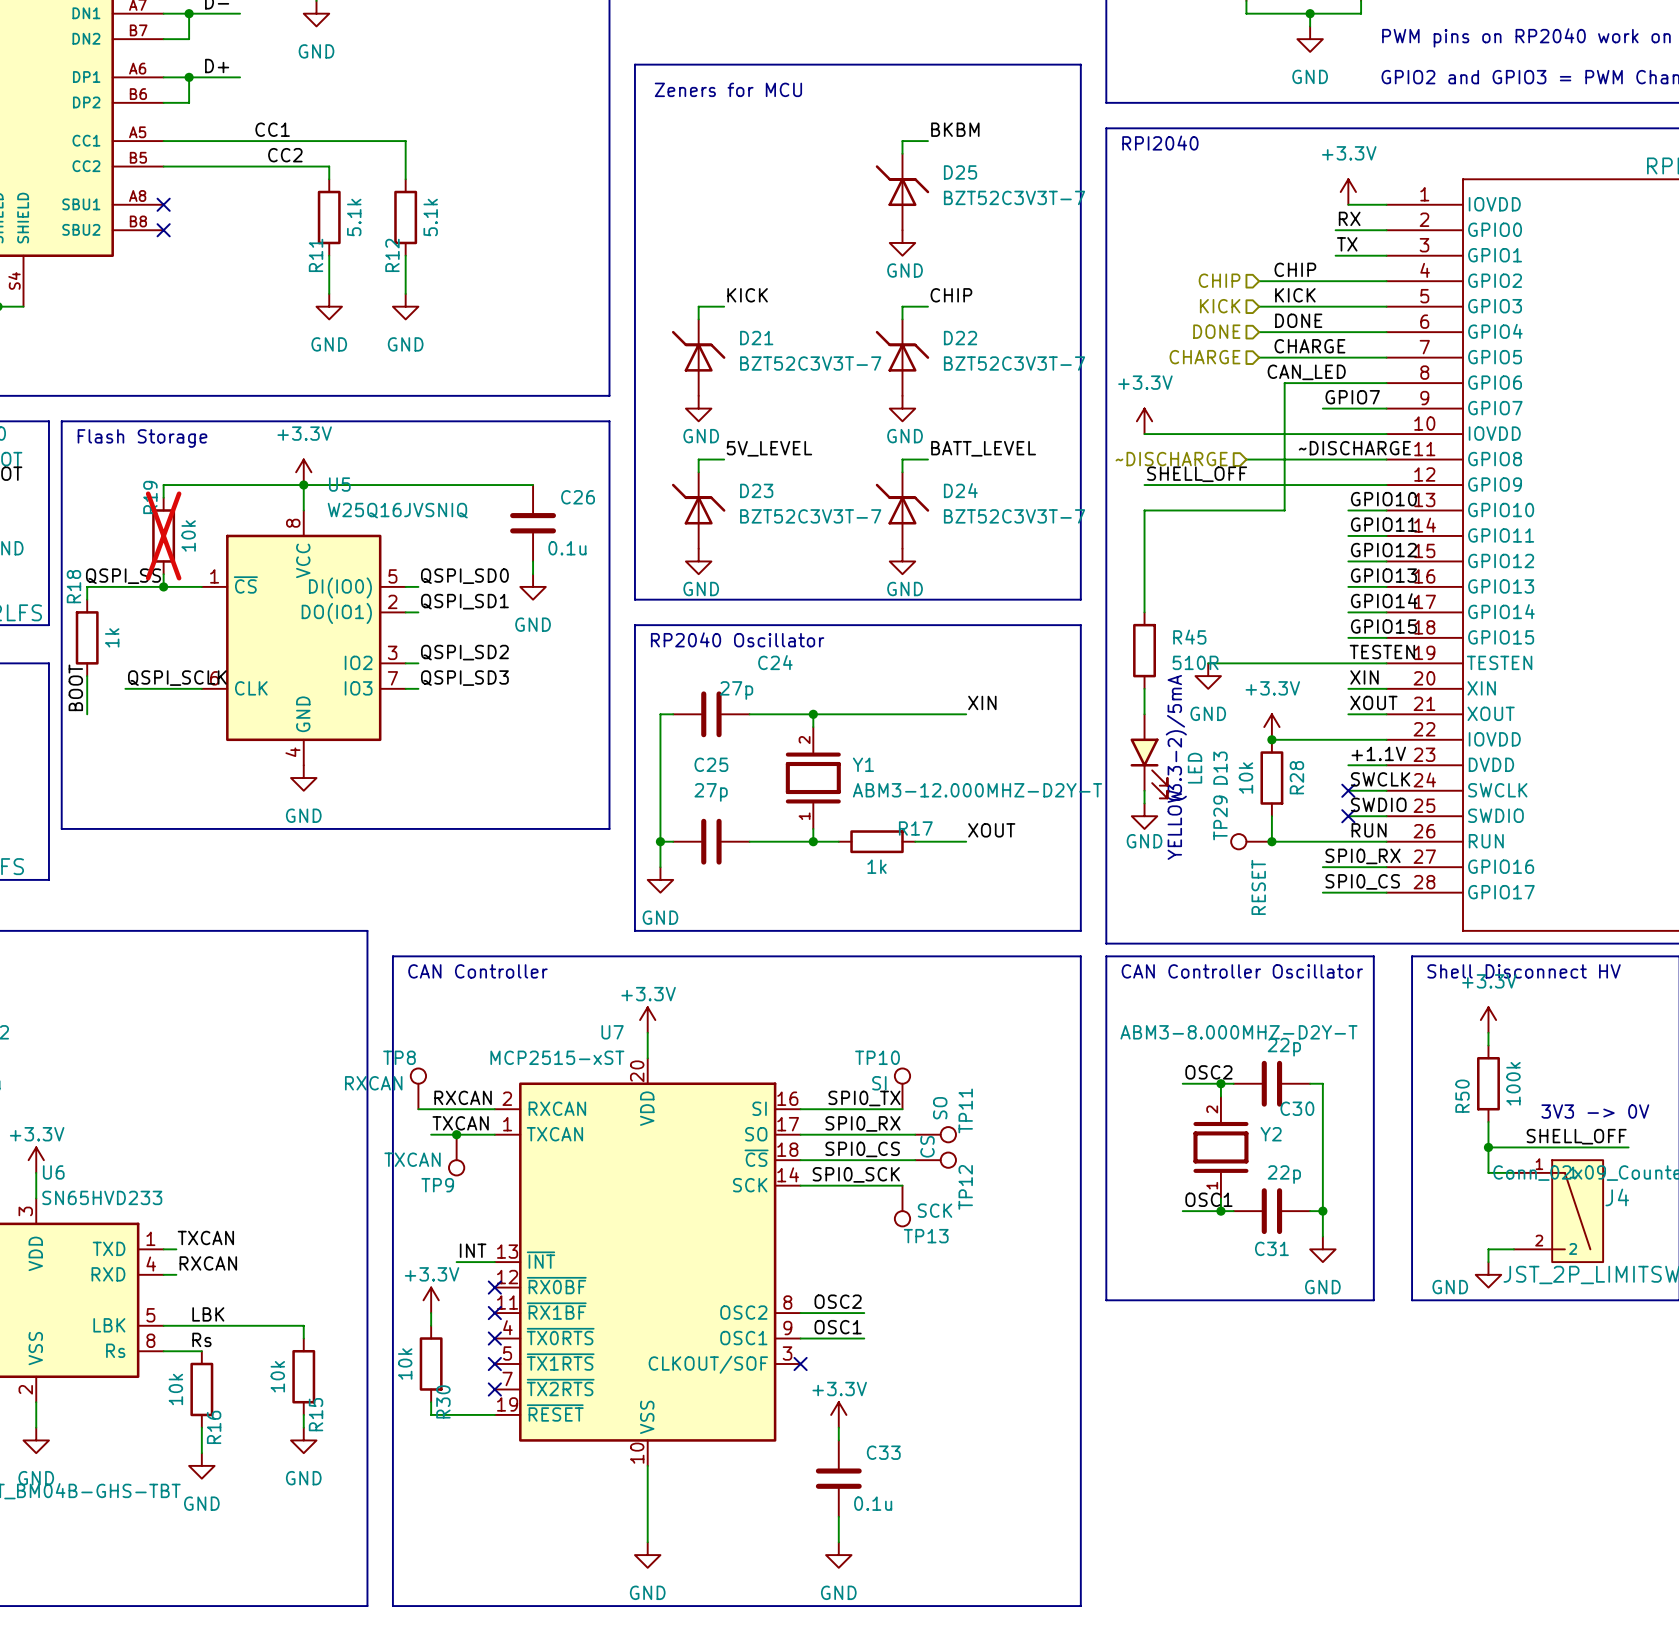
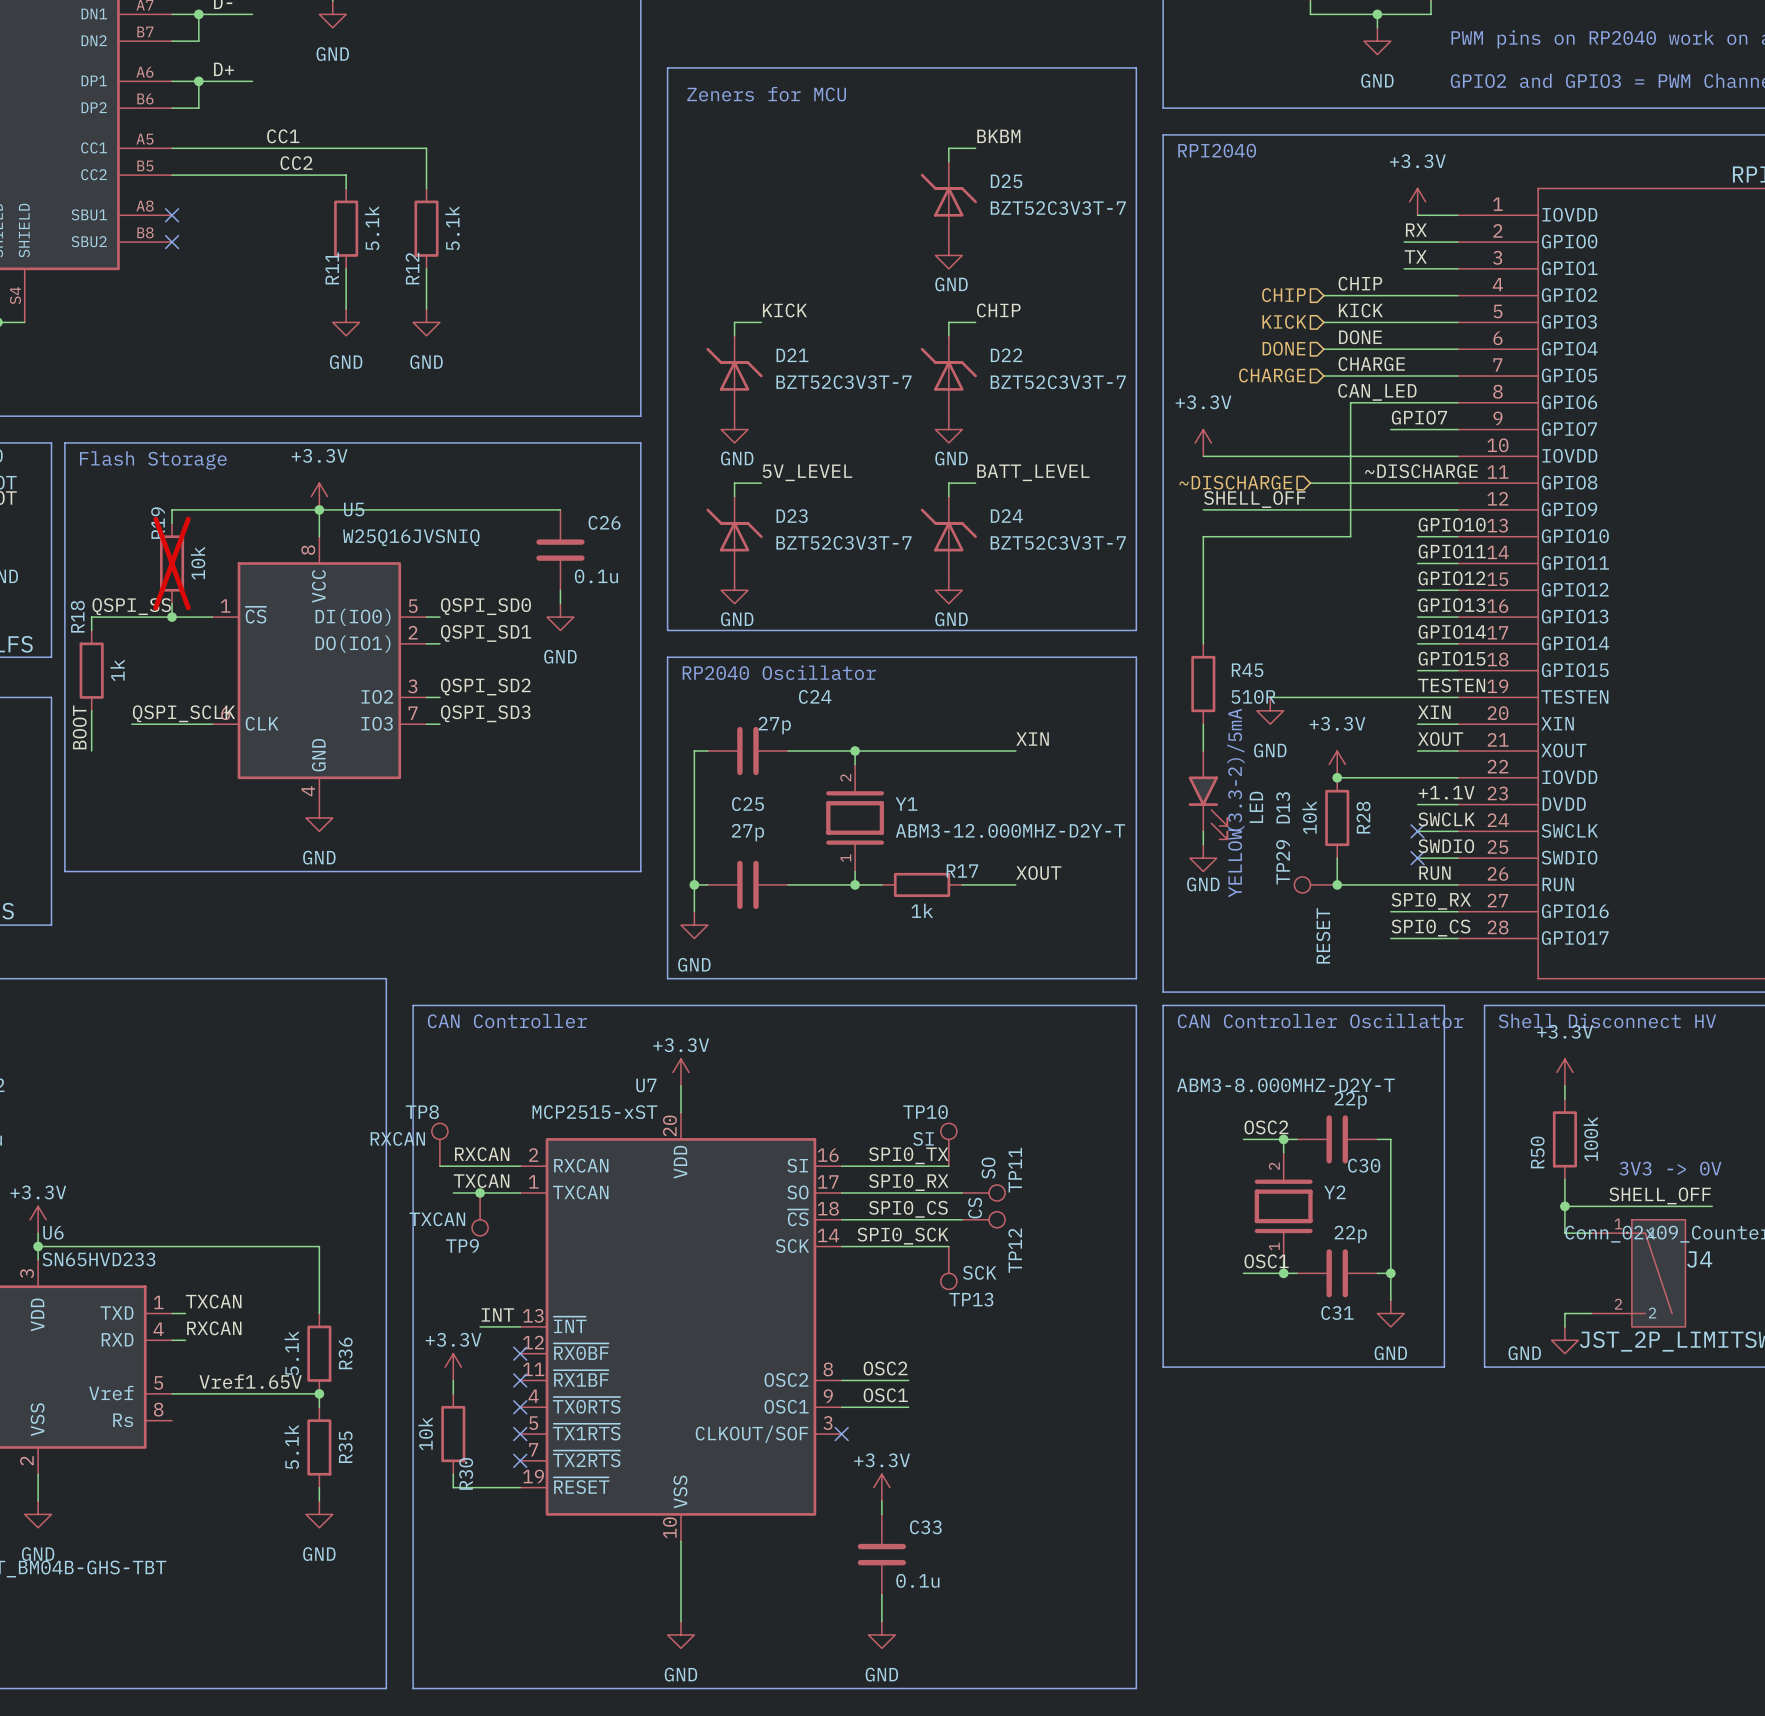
wire: none -> (38, 1246) (319, 1246) (319, 1313)
junction: none -> (38, 1246)
R36: none -> 5.1k (319, 1353)
label: LBK (208, 1314) -> Vref1.65V (250, 1381)
U6 pin name: LBK (109, 1325) -> Vref (111, 1393)
junction: none -> (319, 1393)
label: Rs (201, 1339) -> none
wire: (163, 1351) (201, 1351) -> none
R15 value: 10k (277, 1376) -> 5.1k (291, 1447)
R16: 10k (201, 1389) -> none
R15 name: R15 (316, 1414) -> R35 (345, 1447)
wire: (201, 1427) (201, 1453) -> none
power symbol: GND (201, 1465) -> none

